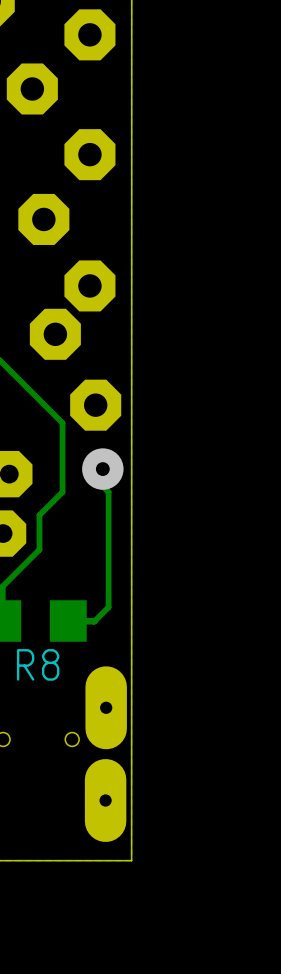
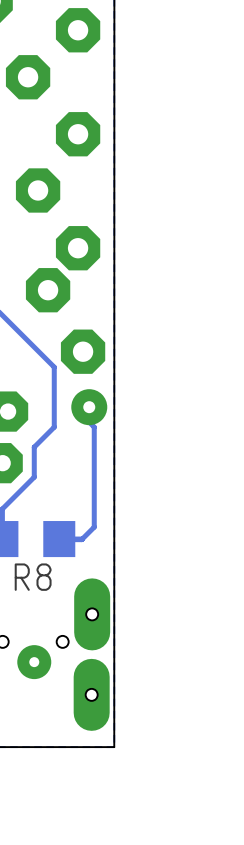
via: none -> (34, 662)

